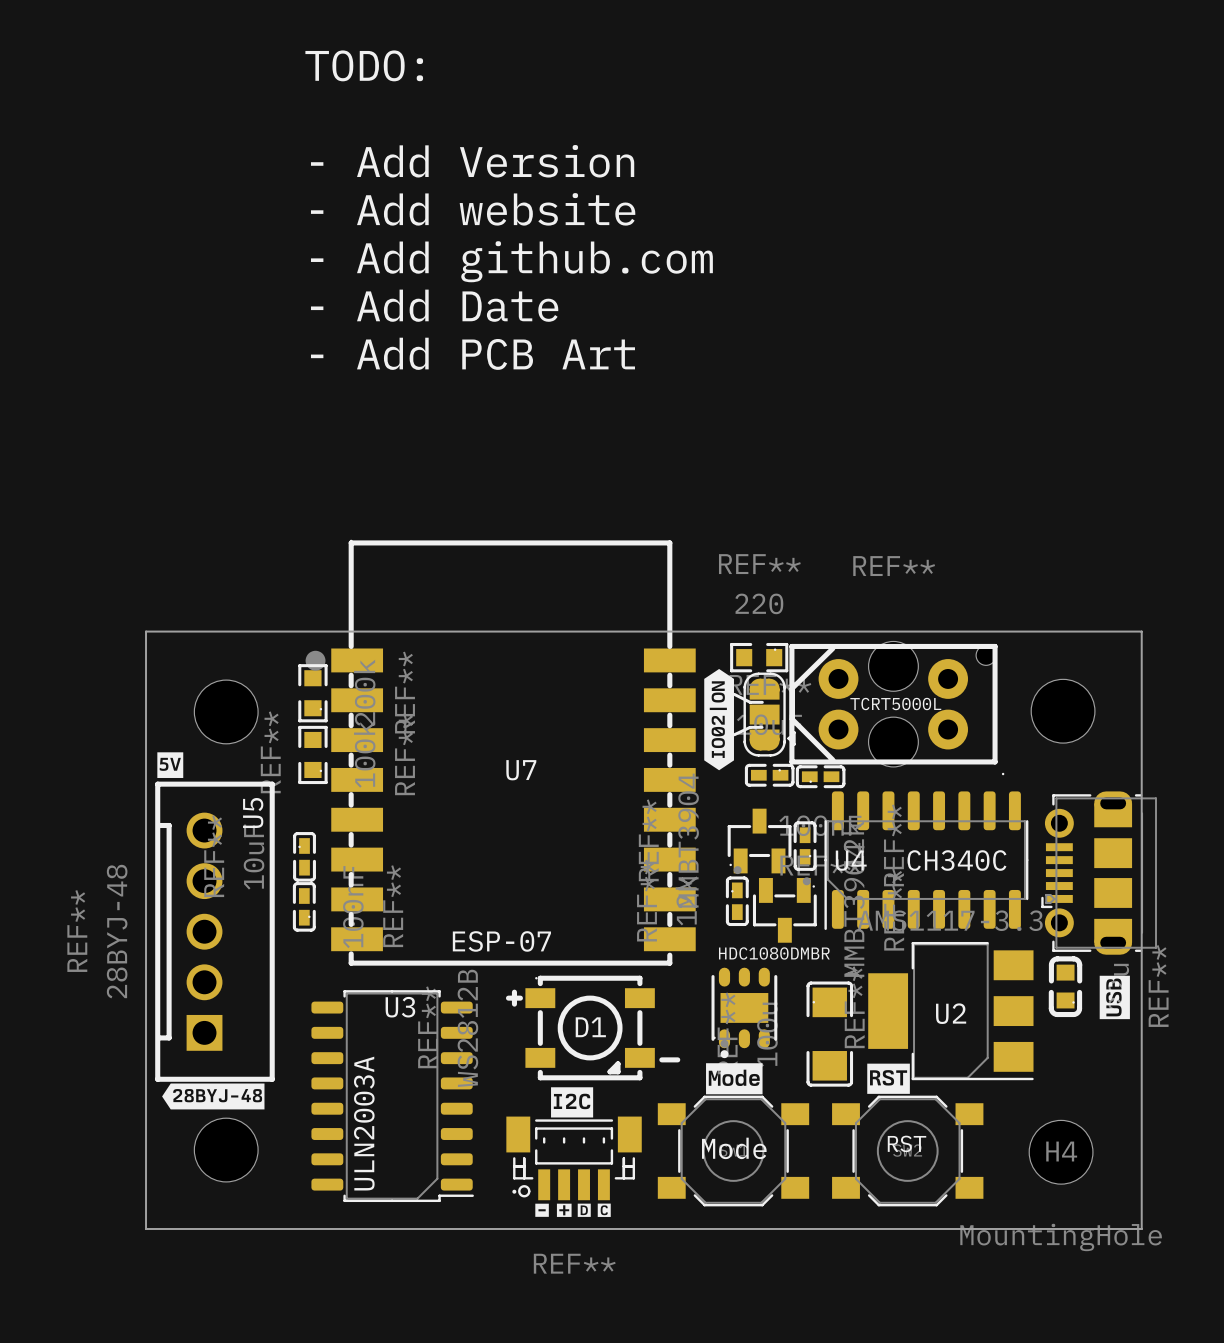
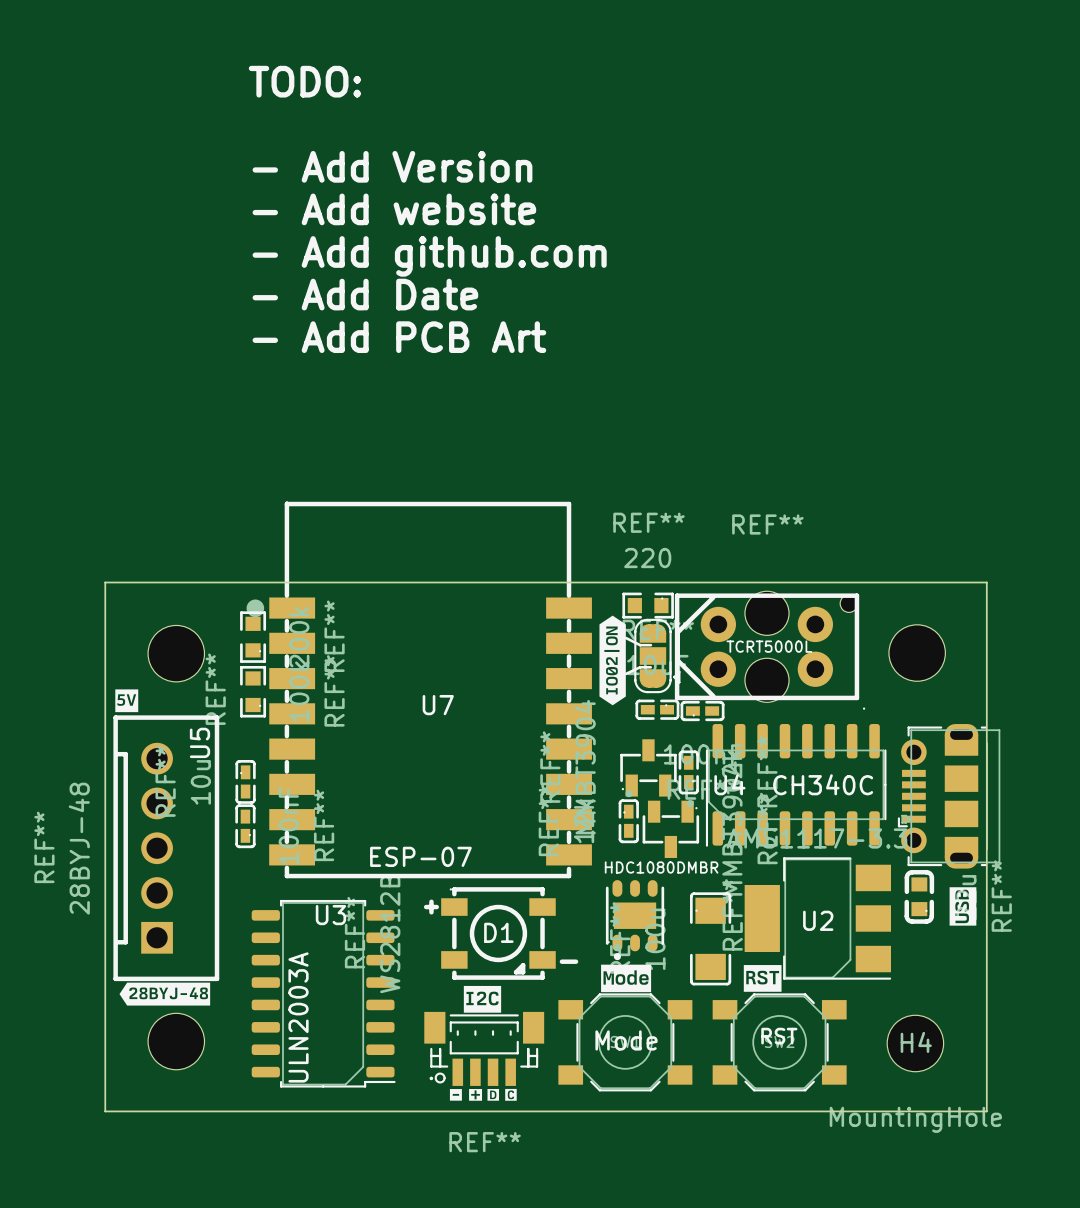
part value: 10uF (254, 857) -> 10u (200, 782)

